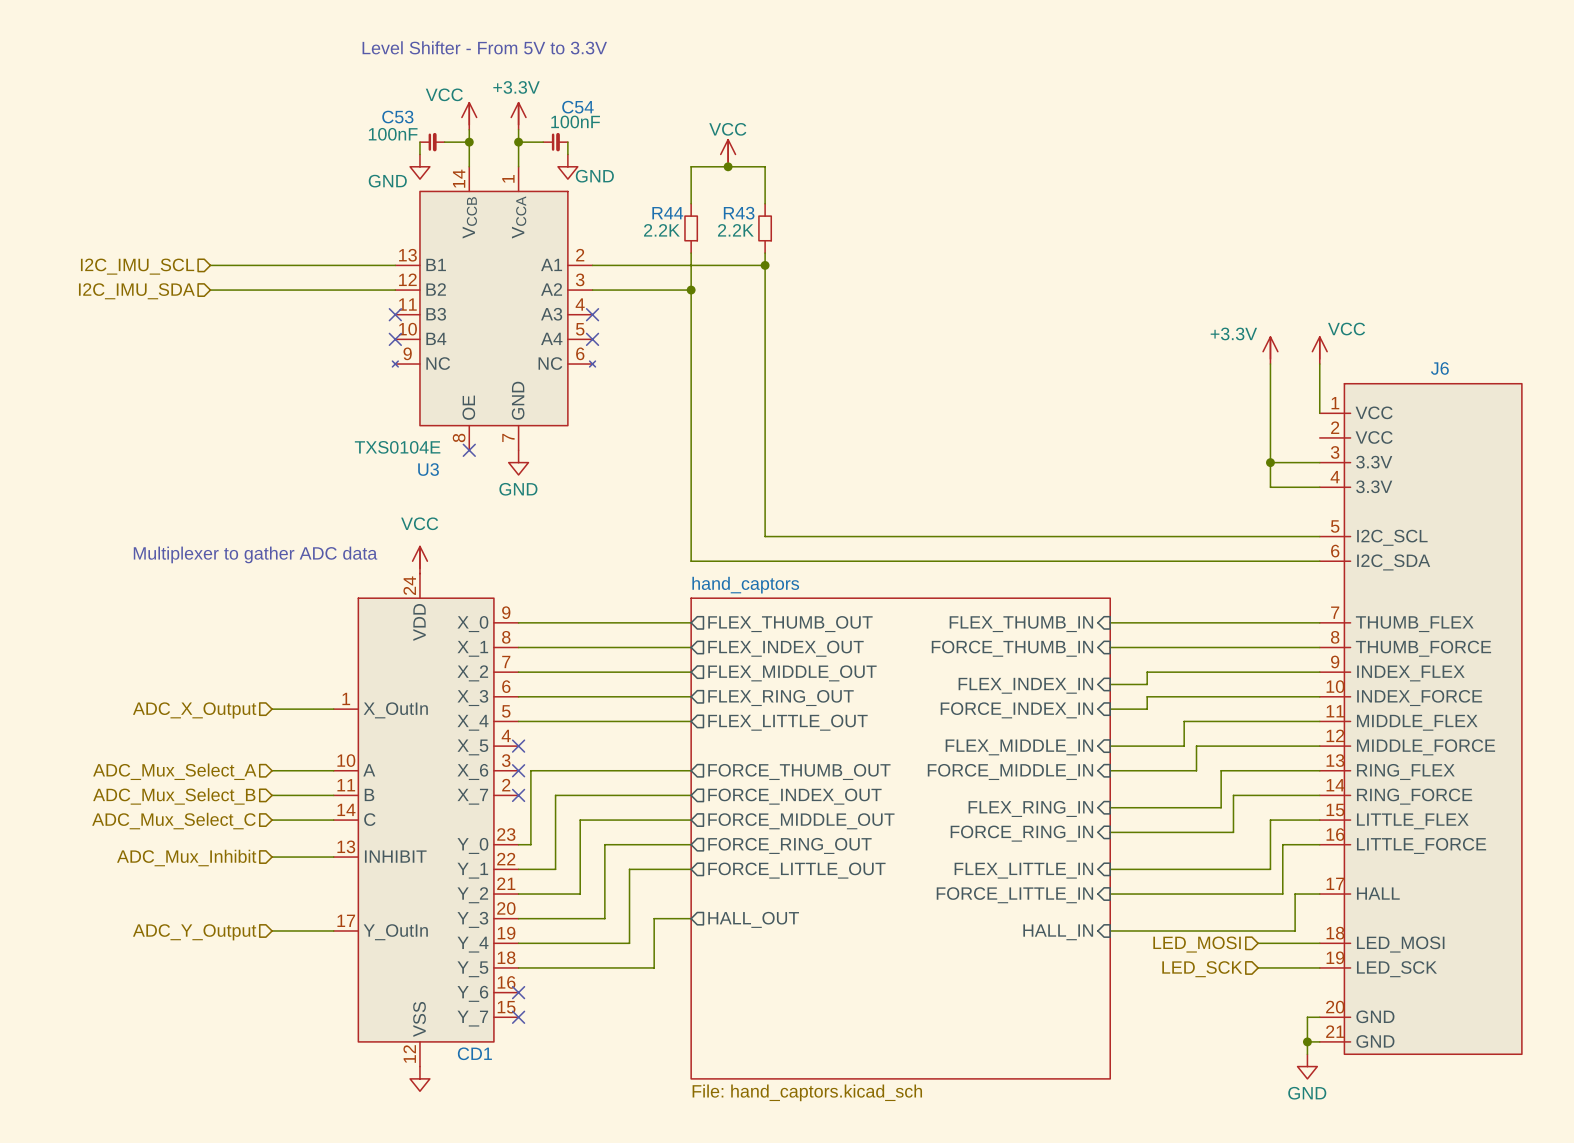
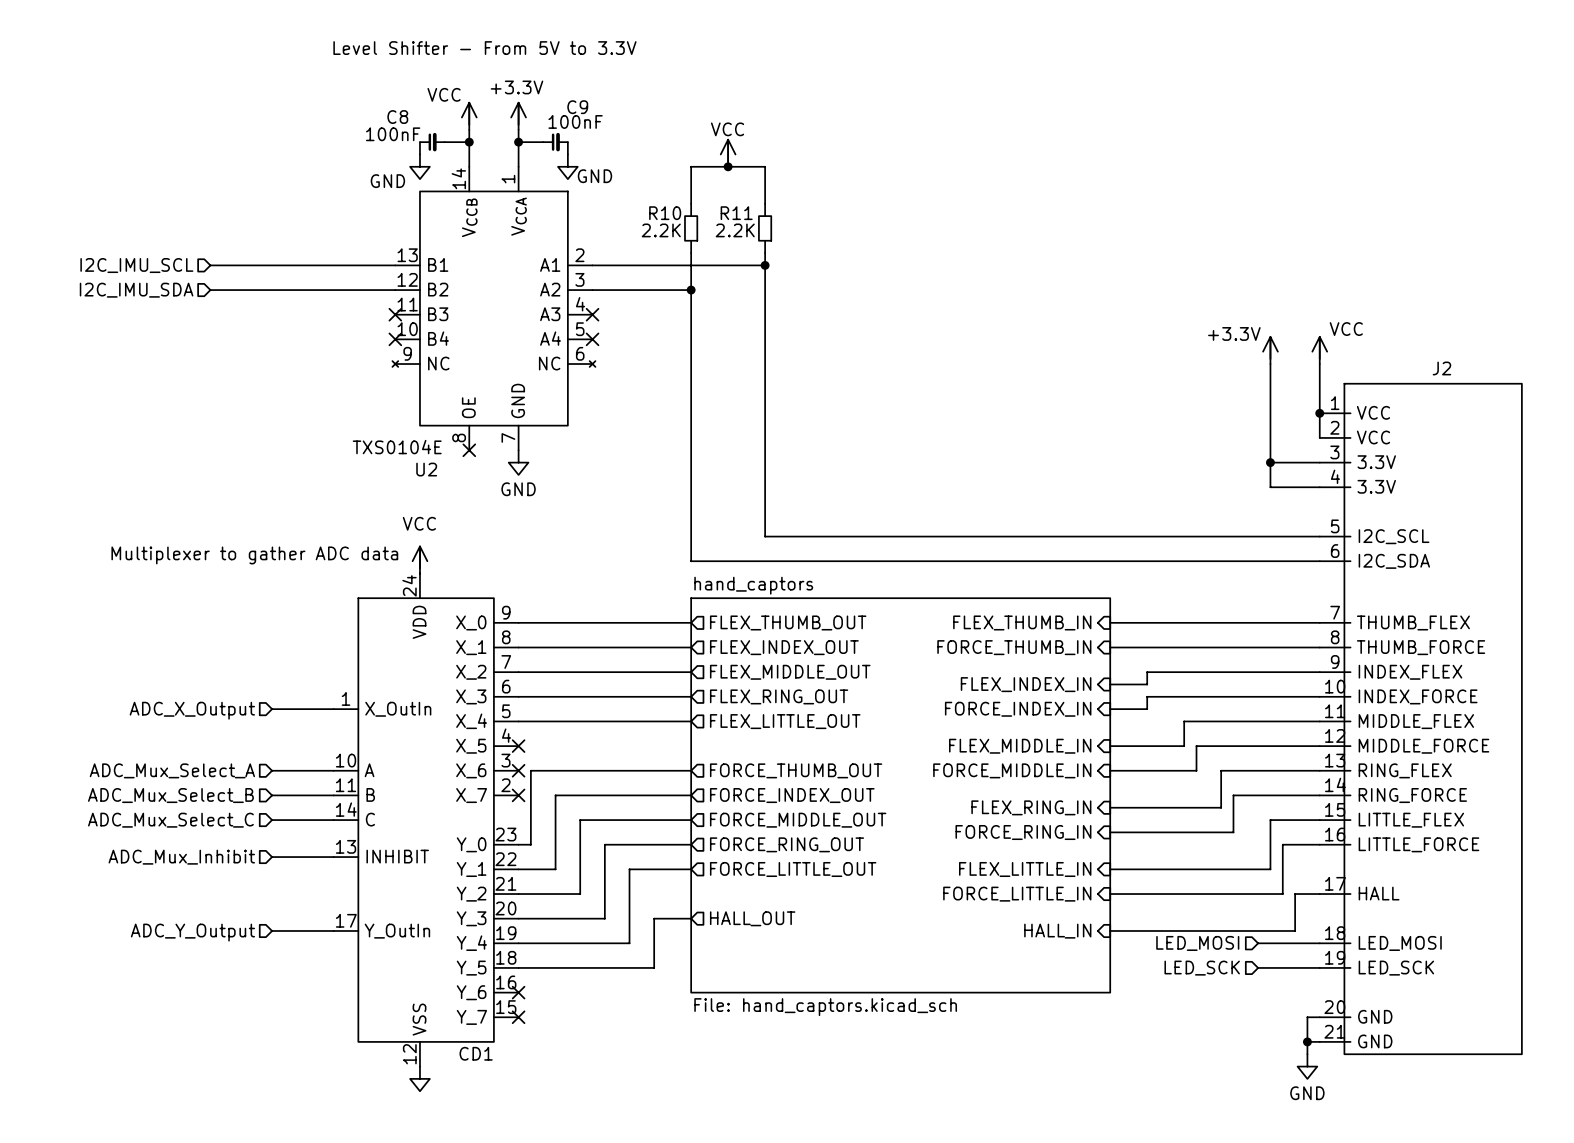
C54 name: C54 (577, 107) -> C9 (577, 107)
C53 name: C53 (397, 117) -> C8 (397, 117)
R44 name: R44 (667, 213) -> R10 (665, 213)
R43 name: R43 (739, 213) -> R11 (736, 213)
J6 name: J6 (1439, 368) -> J2 (1441, 368)
wire: none -> (1319, 413) (1319, 437)
junction: none -> (1319, 413)
U3 name: U3 (428, 469) -> U2 (426, 469)
sheet hand_captors: none -> File: hand_captors.kicad_sch (900, 795)
sheet hand_captors: File: hand_captors.kicad_sch (900, 838) -> none

